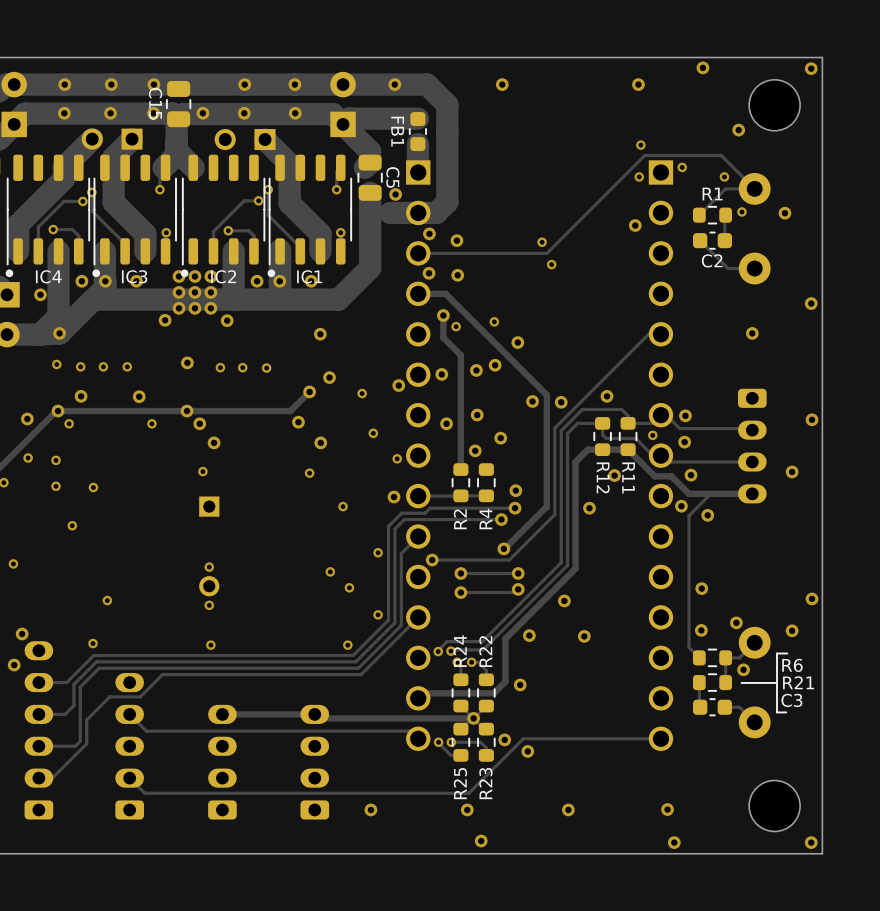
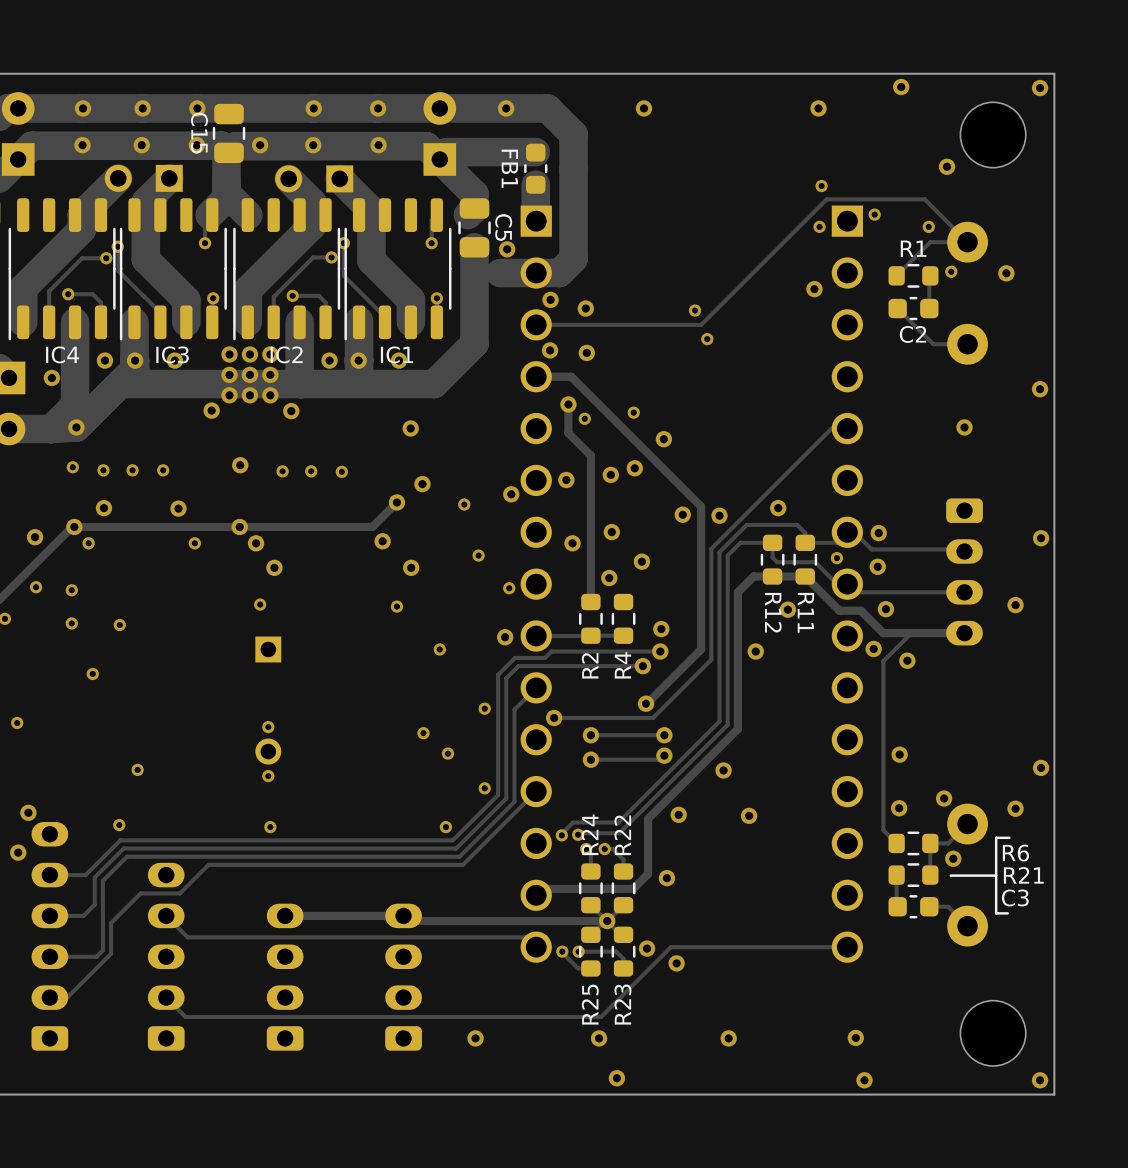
track: none -> (288, 178) (312, 202) (312, 225) (247, 290) (247, 322)
IC4 footprint: [5, 154, 91, 278] -> [8, 198, 116, 341]
IC3 footprint: [92, 154, 177, 278] -> [119, 198, 227, 341]
IC2 footprint: [180, 154, 266, 278] -> [233, 198, 341, 341]
IC1 footprint: [267, 154, 353, 278] -> [344, 198, 452, 341]

